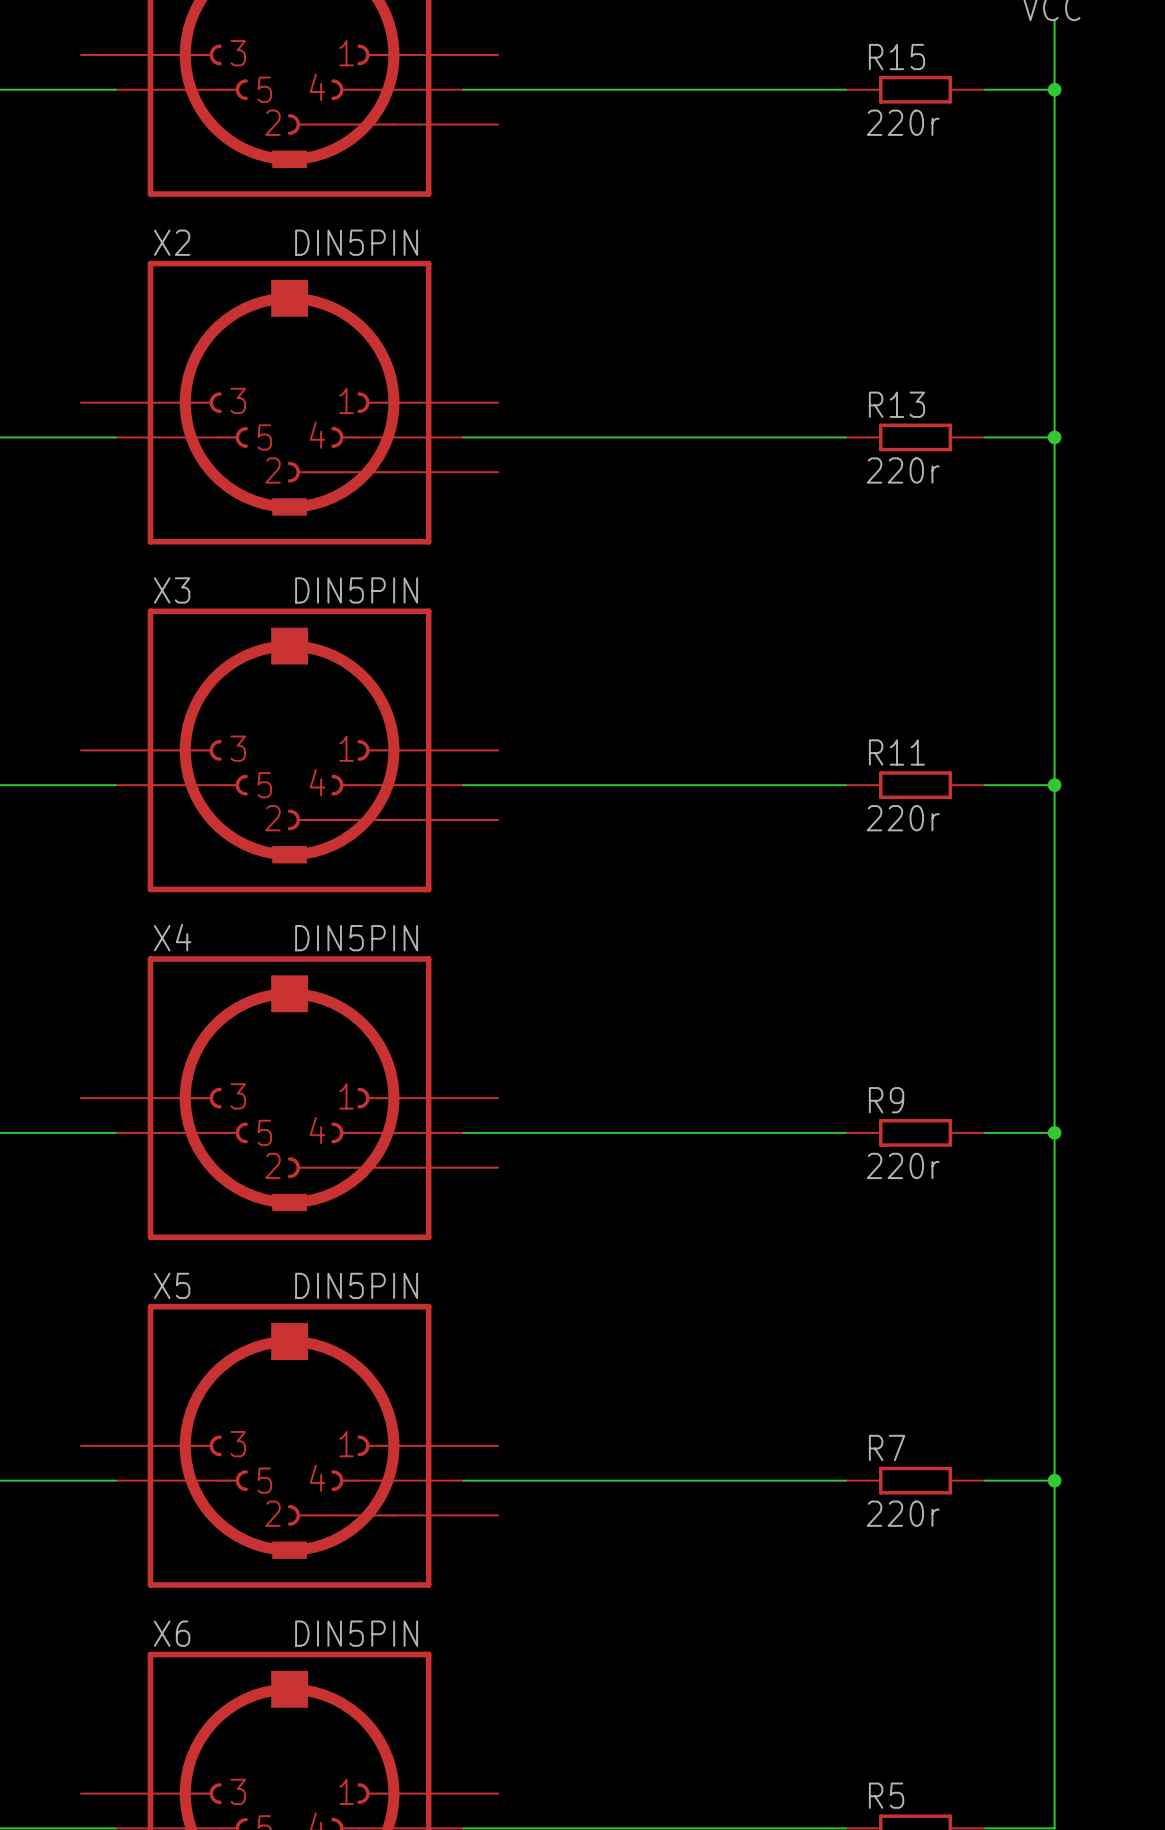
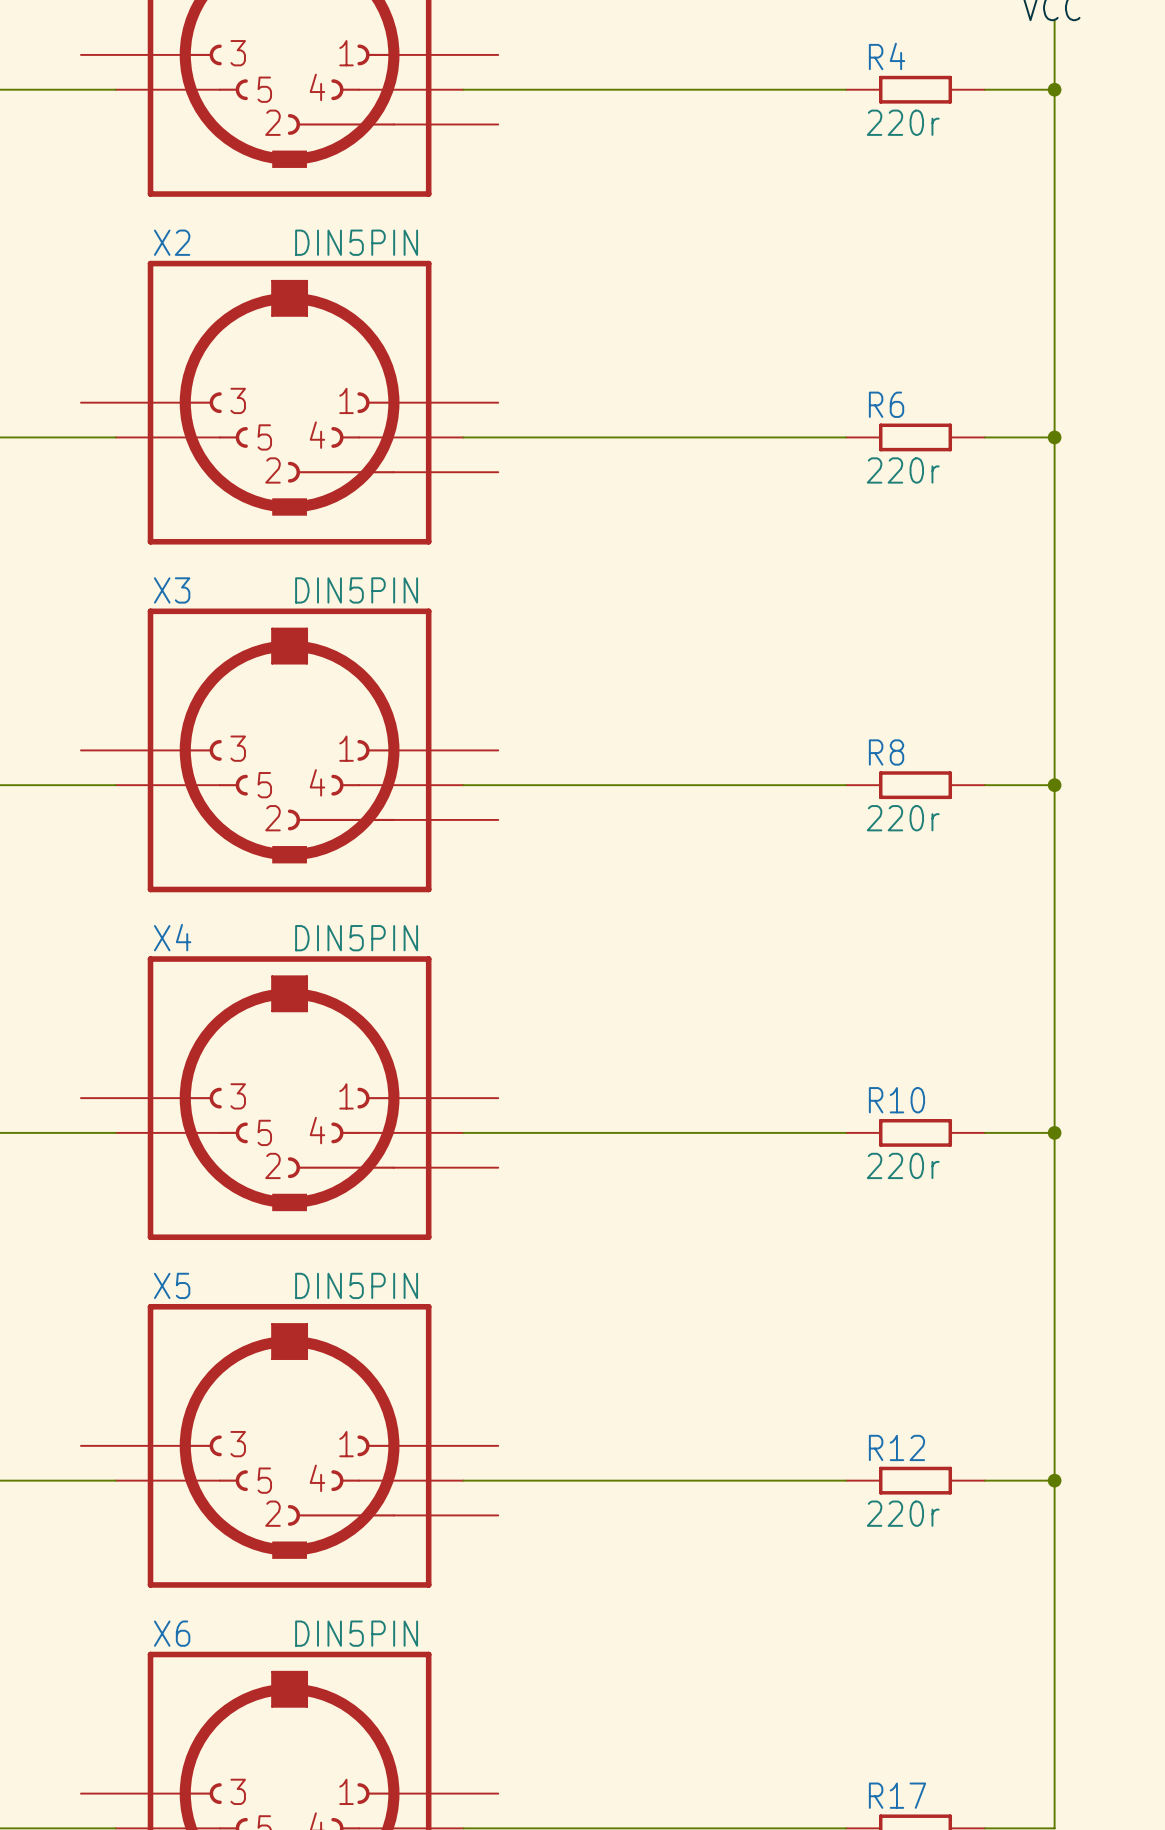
R15 name: R15 (896, 57) -> R4 (887, 56)
R13 name: R13 (896, 404) -> R6 (886, 404)
R11 name: R11 (896, 752) -> R8 (886, 752)
R9 name: R9 (886, 1100) -> R10 (896, 1100)
R7 name: R7 (887, 1447) -> R12 (896, 1447)
R5 name: R5 (886, 1795) -> R17 (897, 1795)

